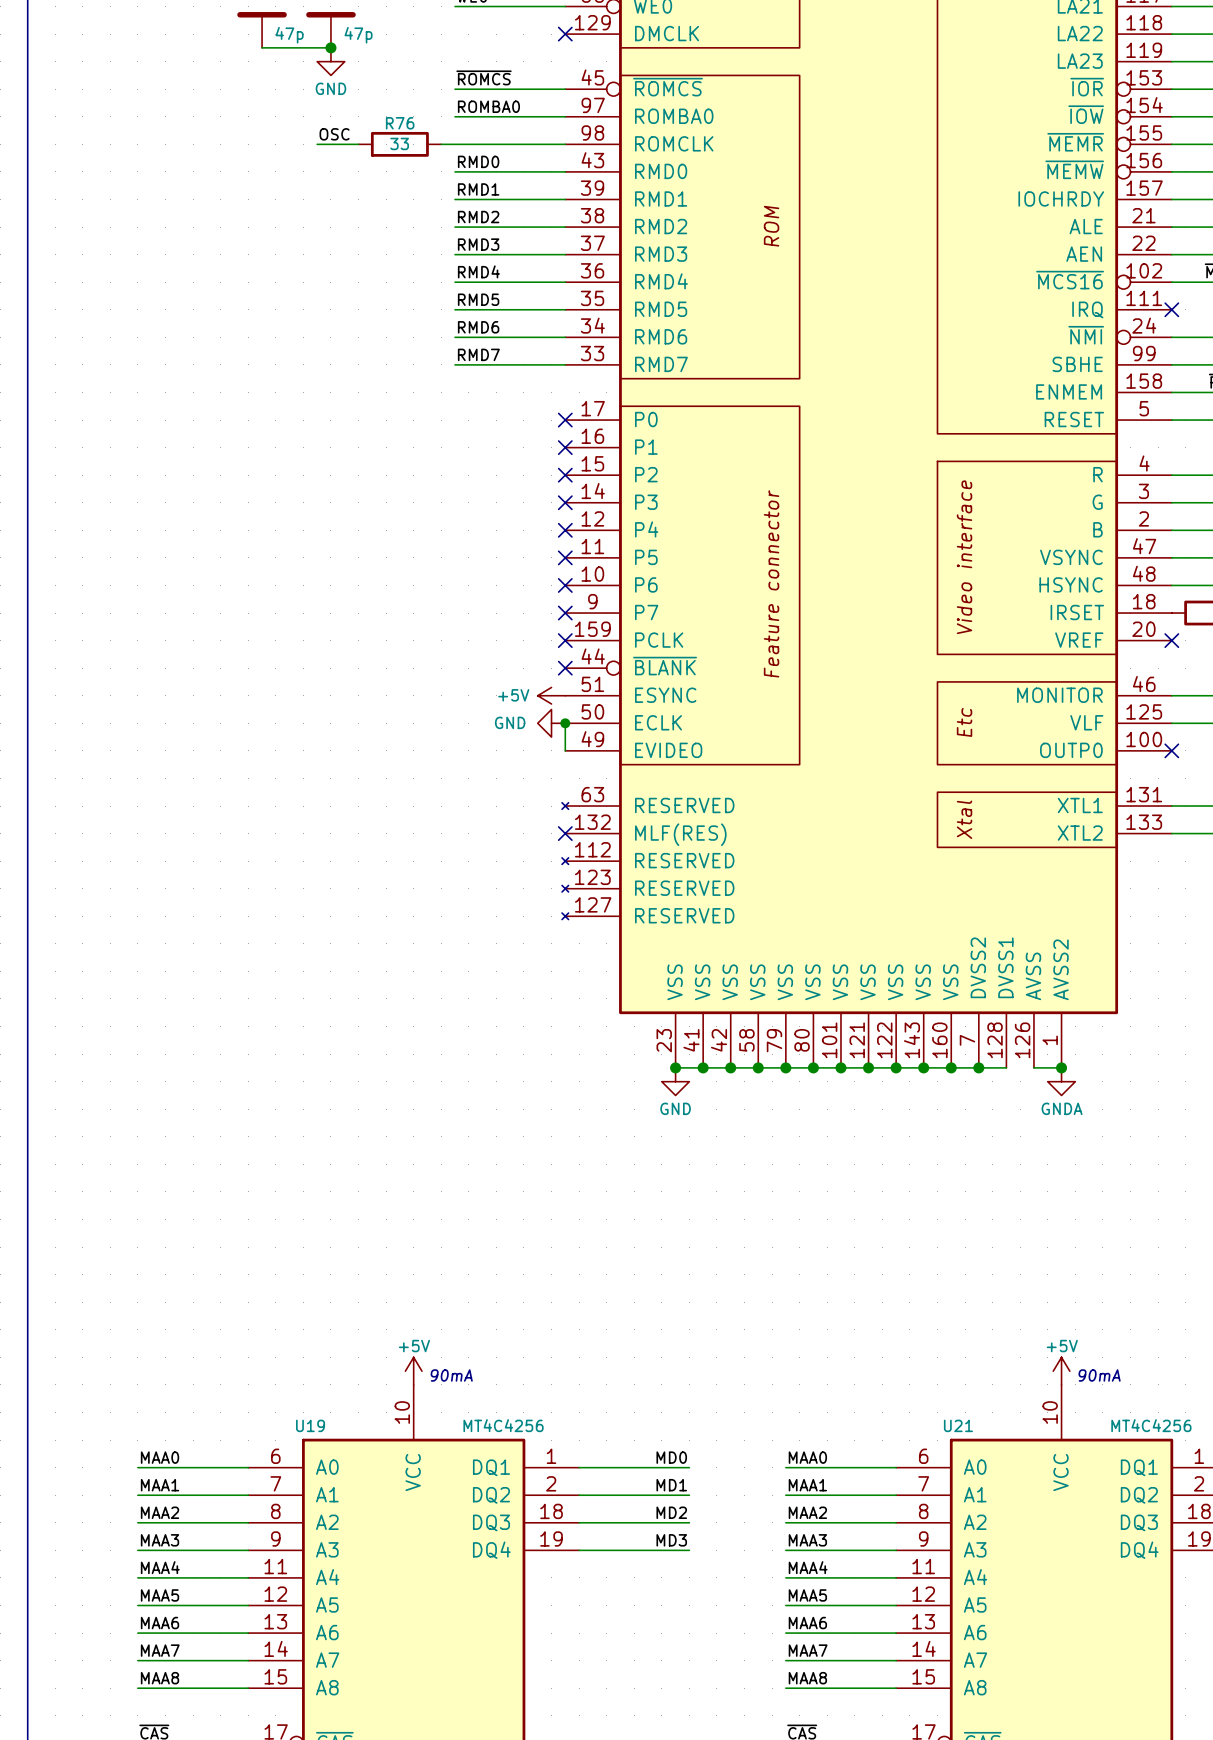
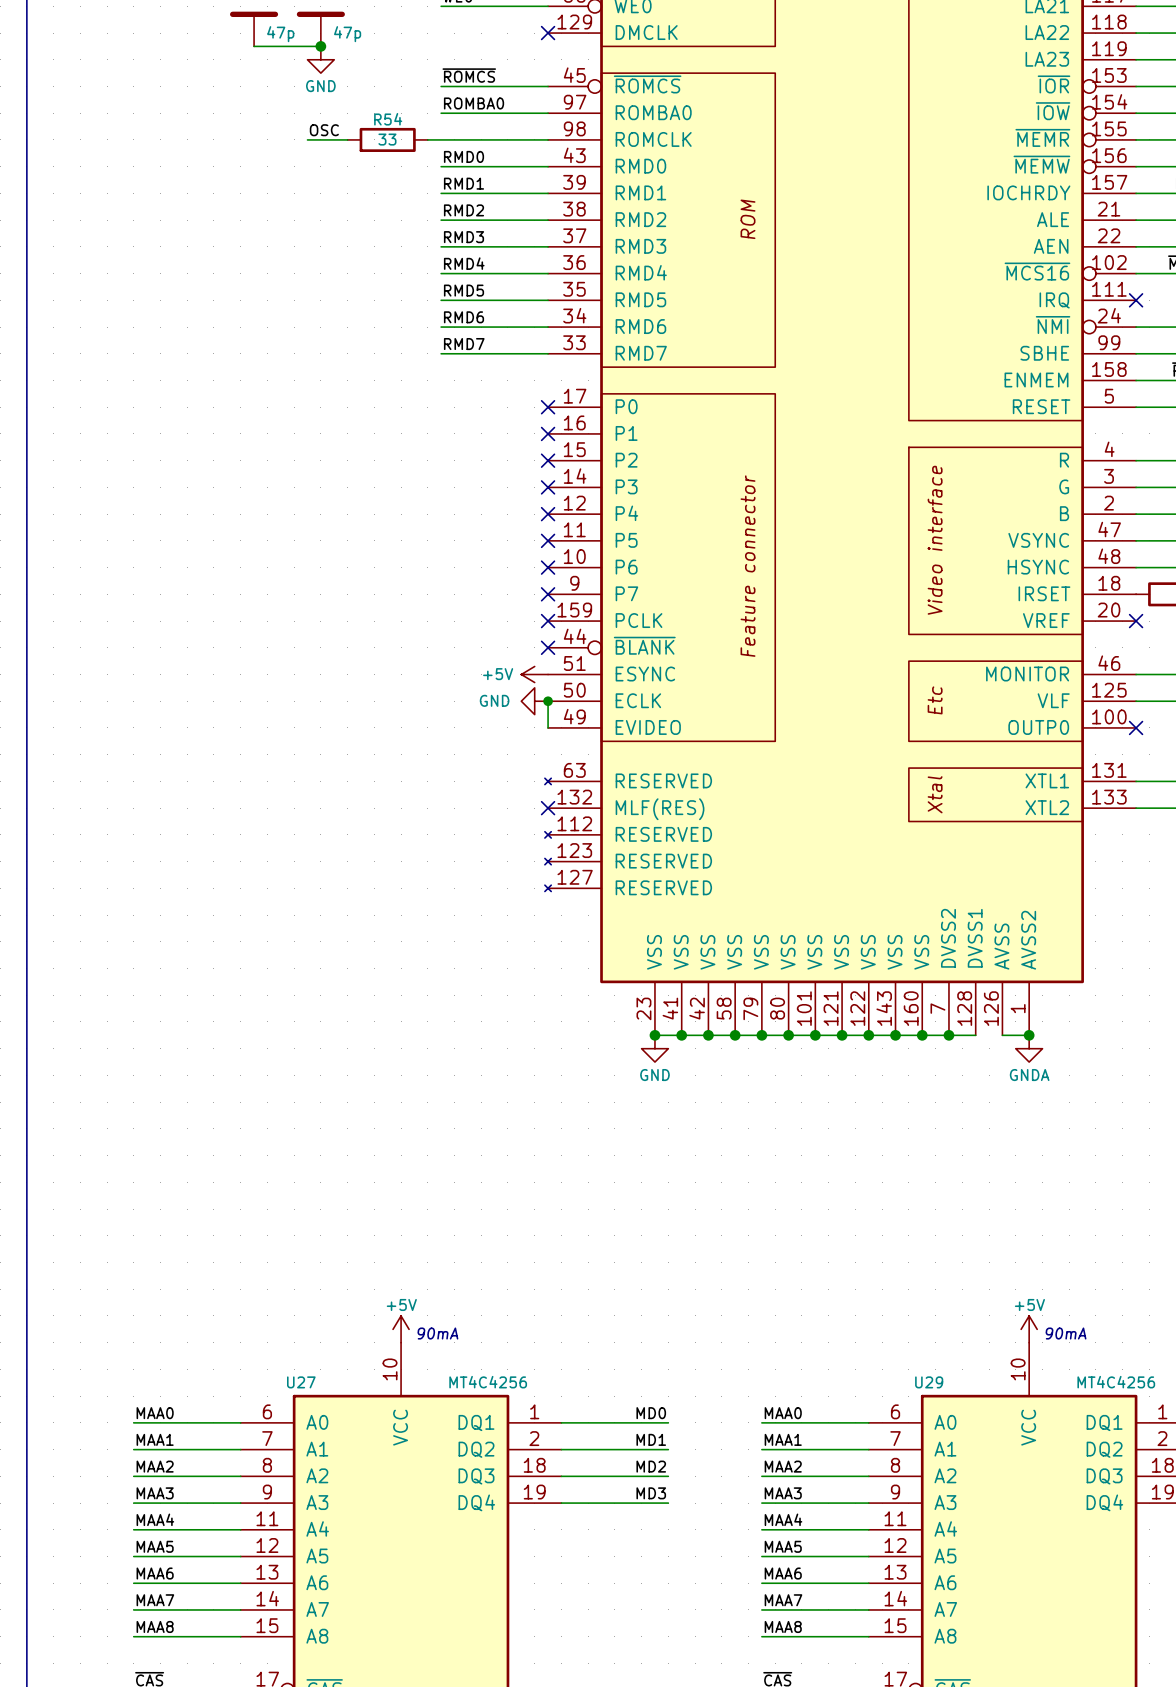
R76 name: R76 (400, 123) -> R54 (388, 119)
U19 name: U19 (310, 1425) -> U27 (301, 1382)
U21 name: U21 (958, 1425) -> U29 (929, 1382)

